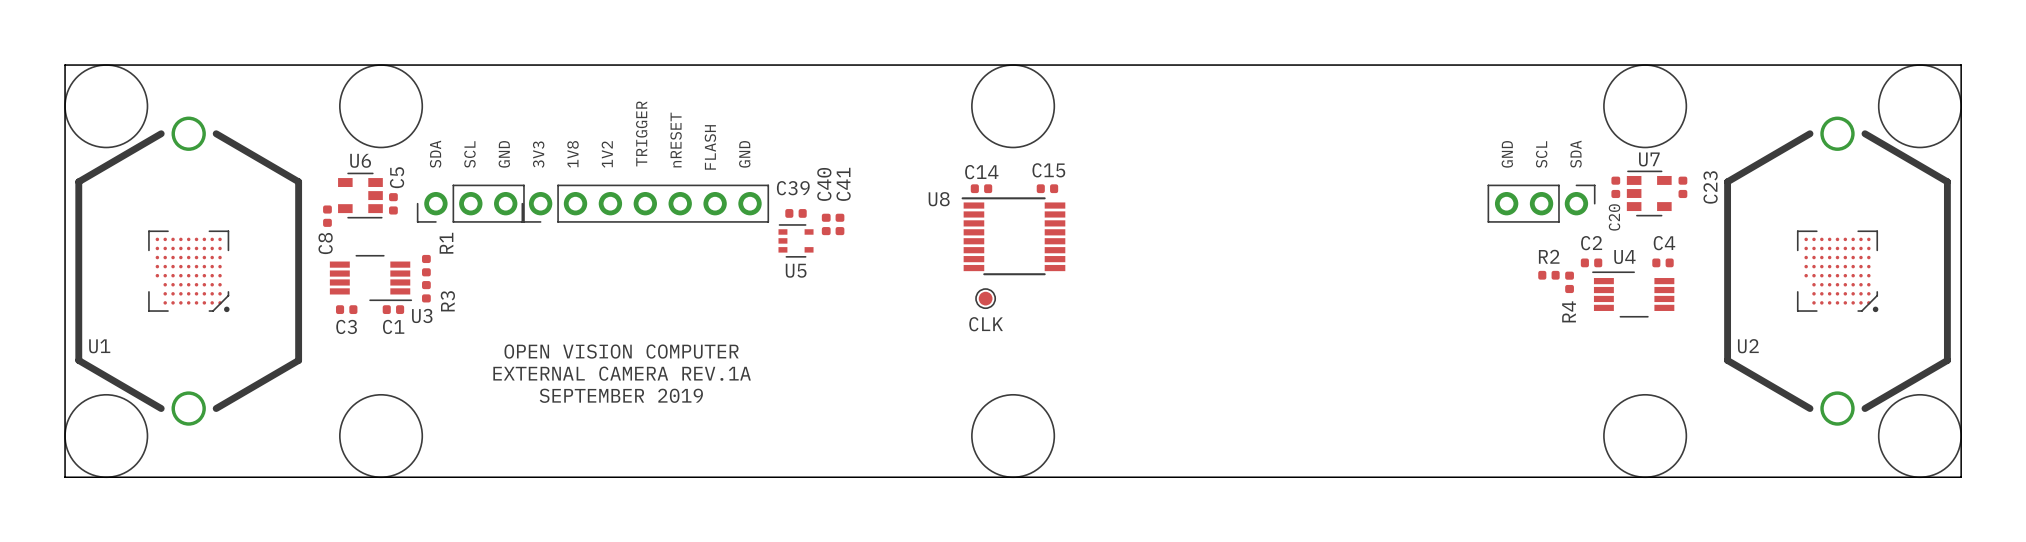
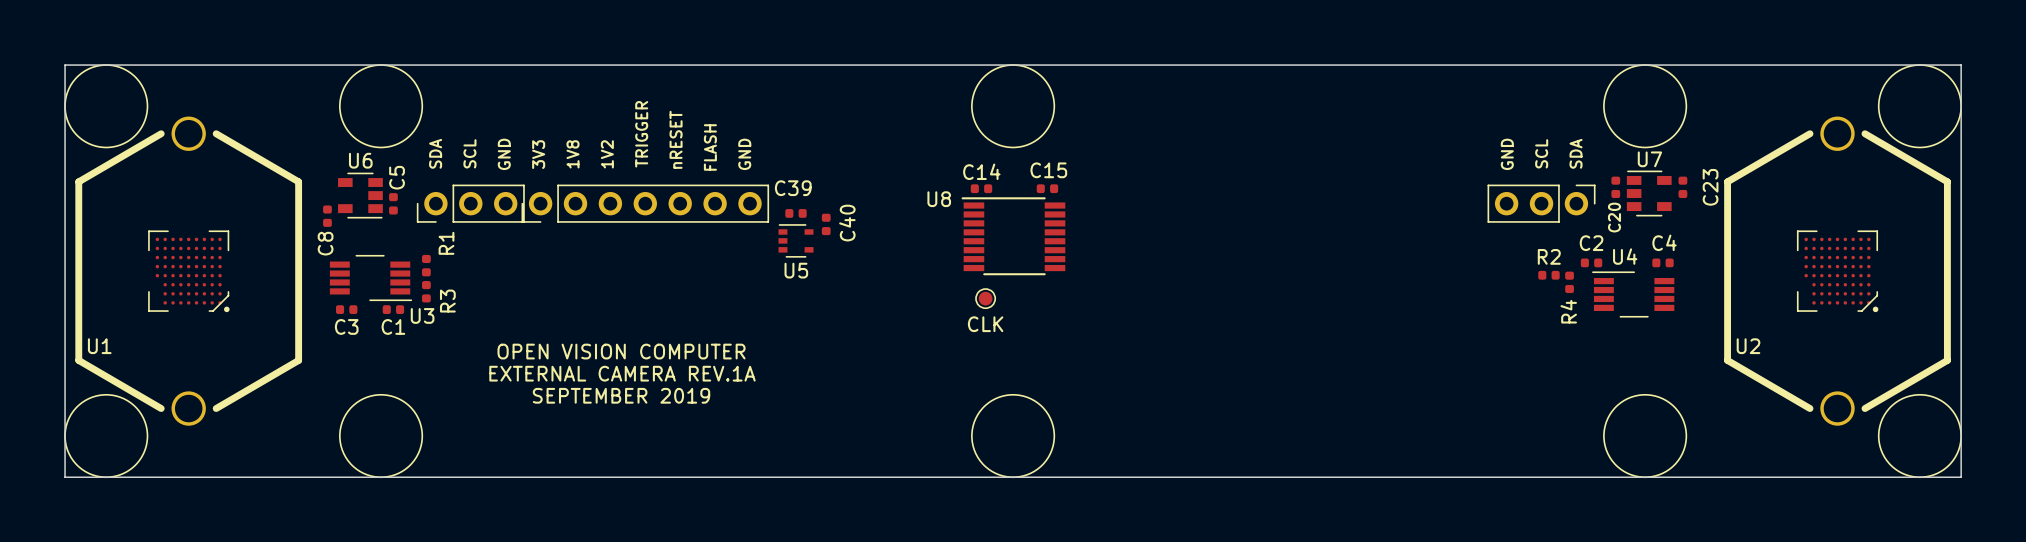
C40 name position: C40 (824, 184) -> C40 (847, 223)
C41: (839, 224) -> none

